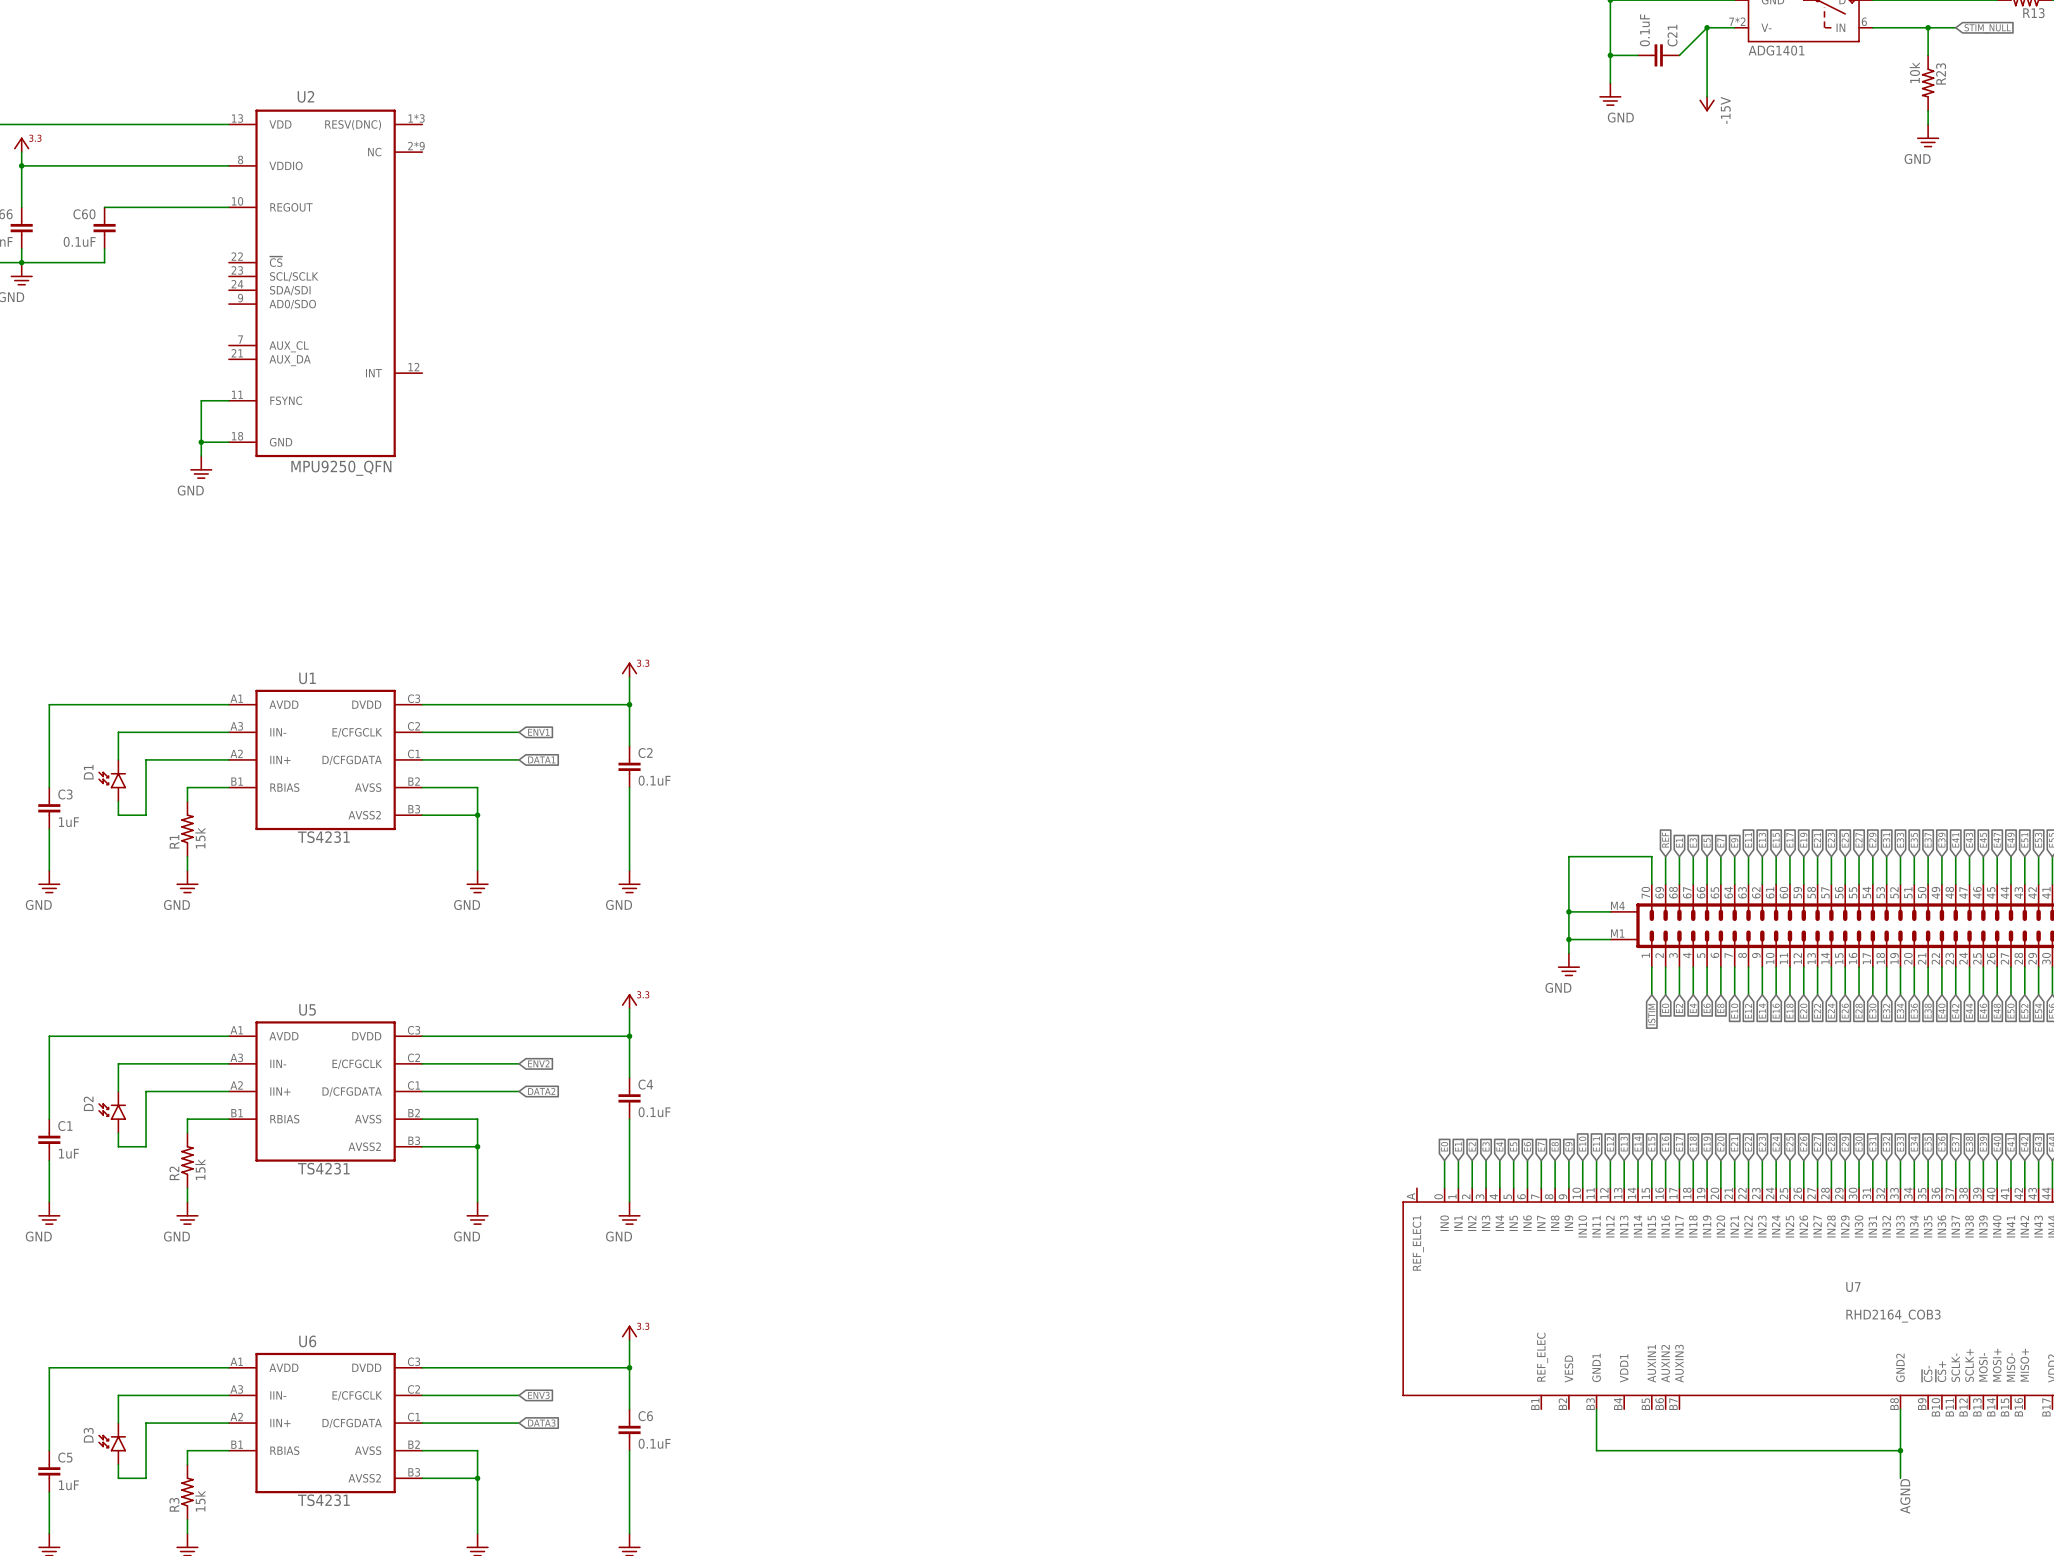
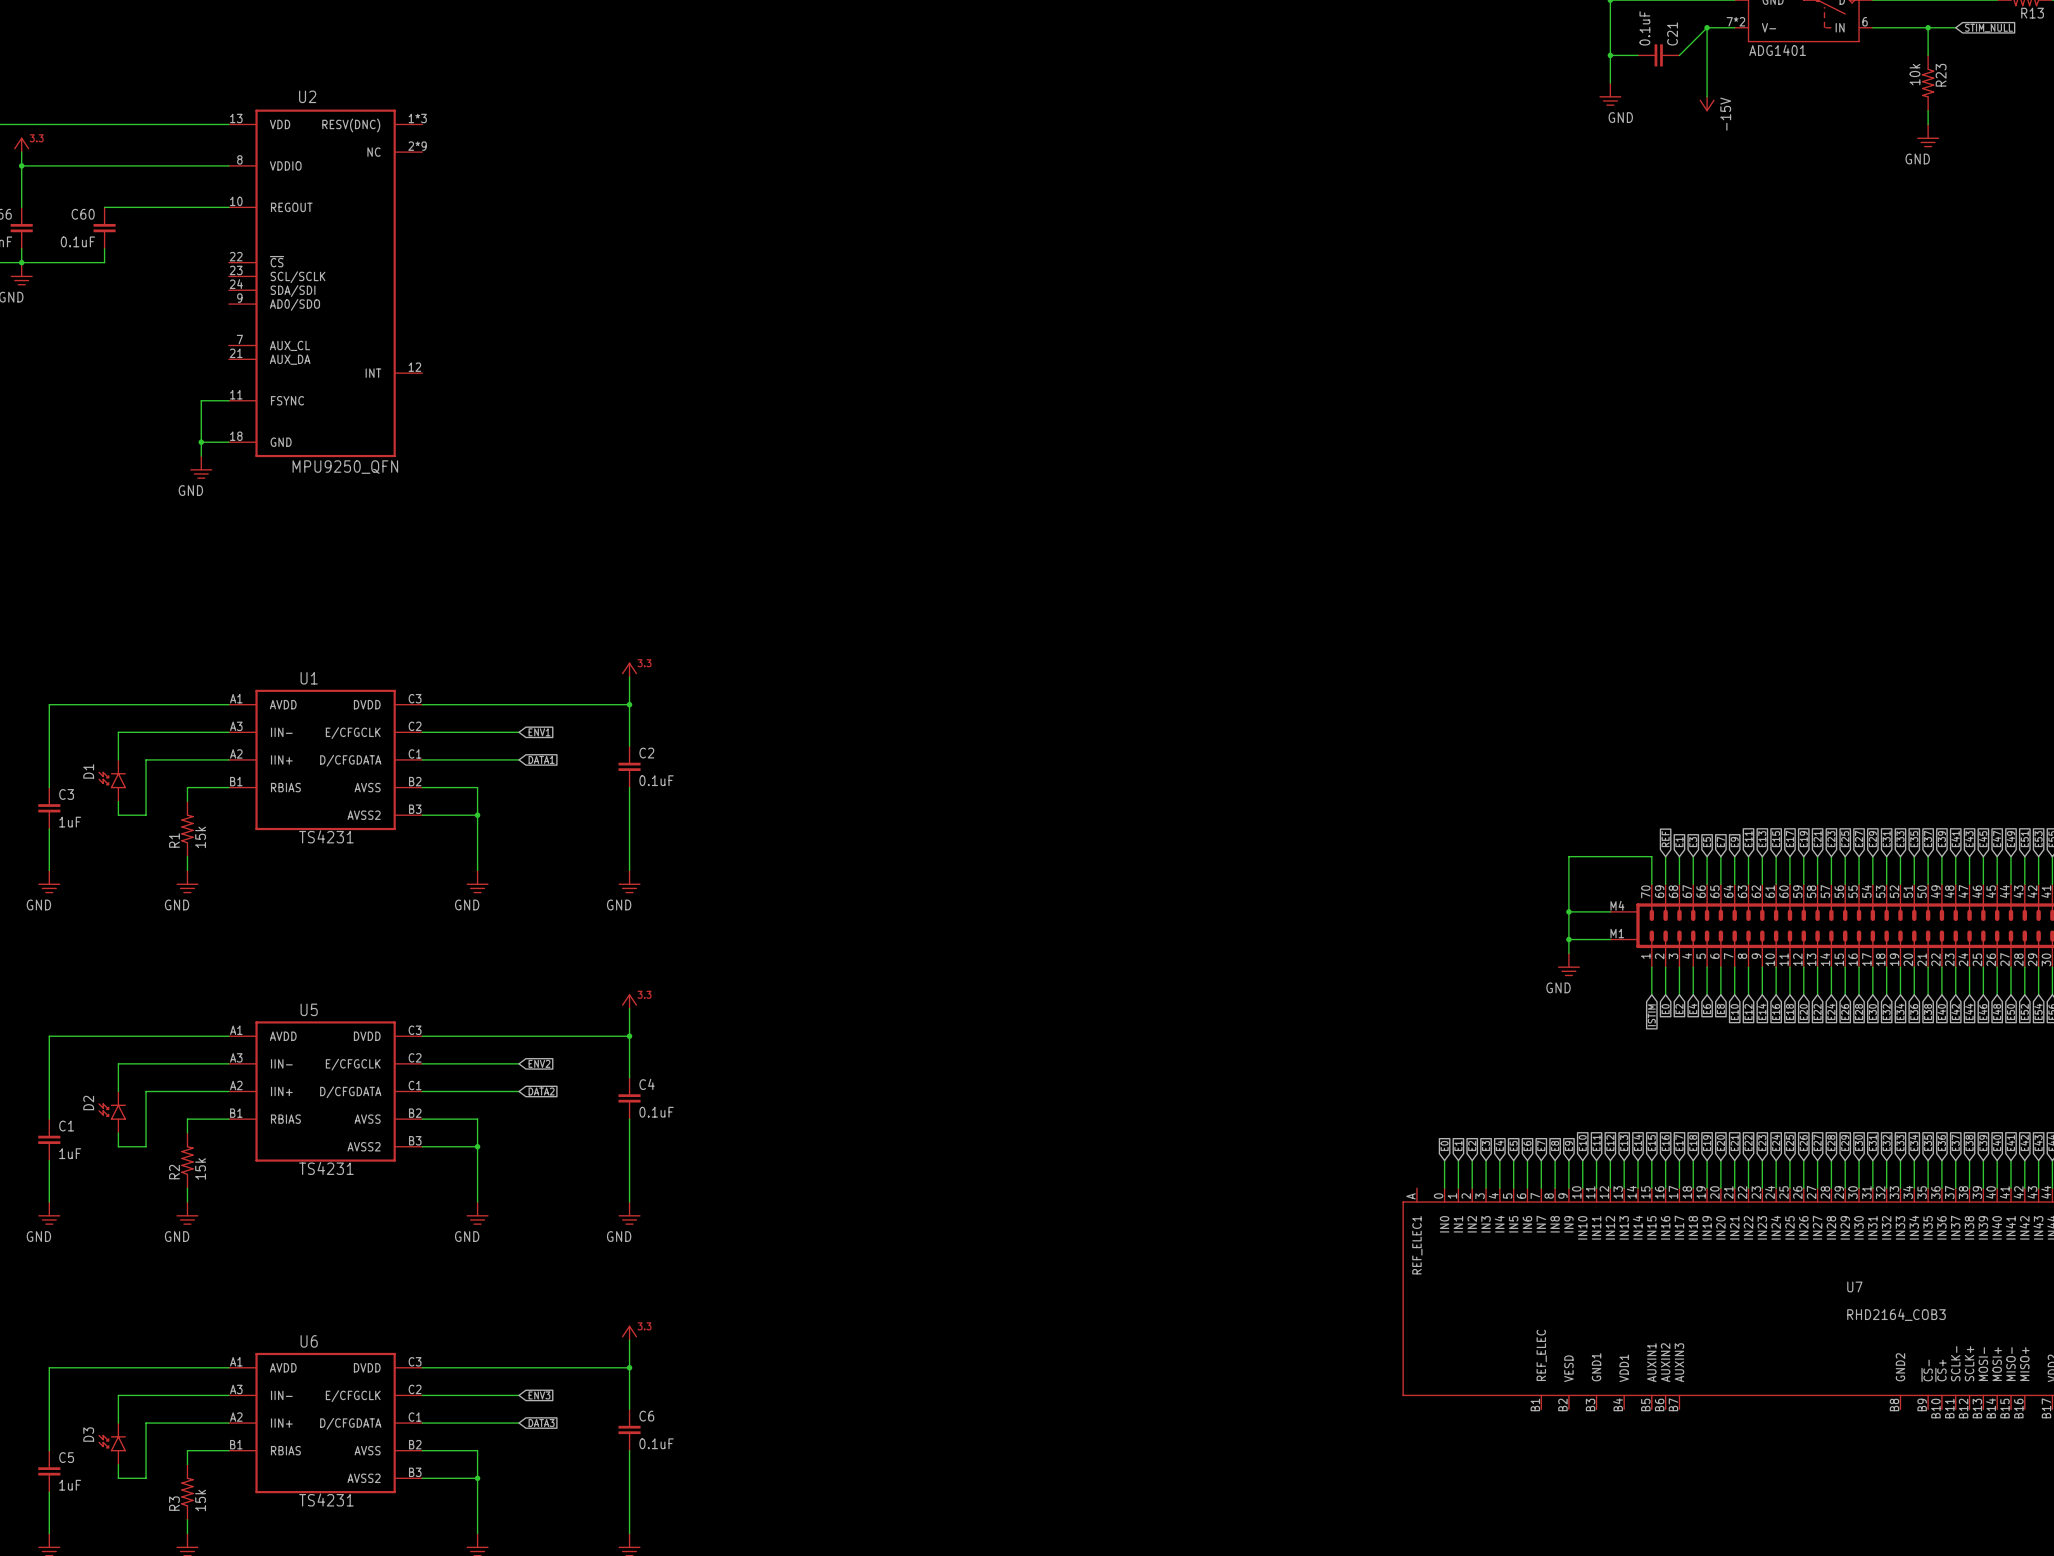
wire: (1596, 1409) (1596, 1450) (1900, 1450) -> none
wire: (1900, 1409) (1900, 1478) -> none
junction: (1900, 1450) -> none
label: AGND (1905, 1496) -> none

